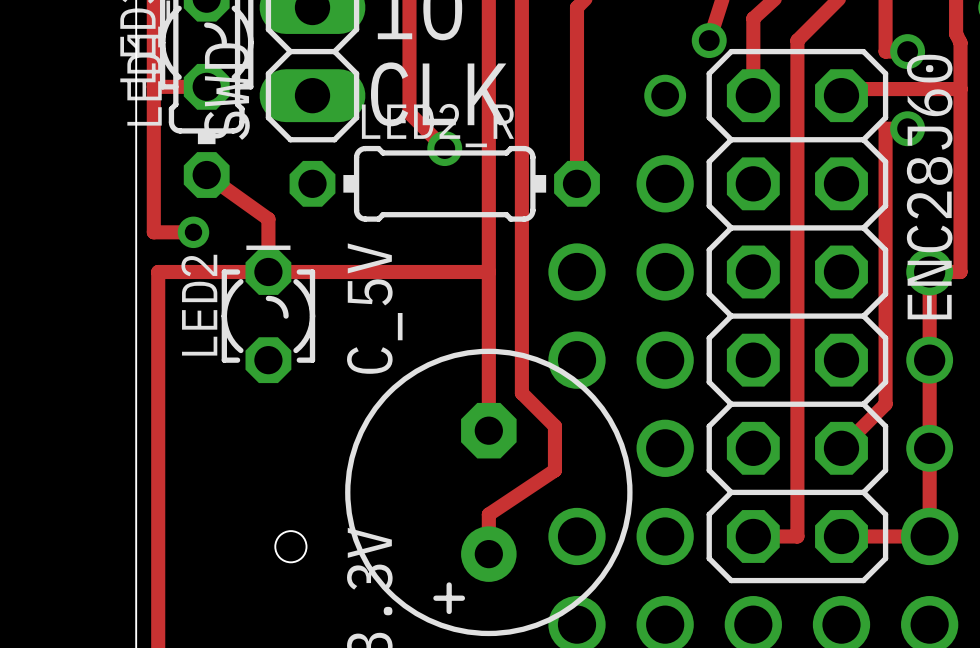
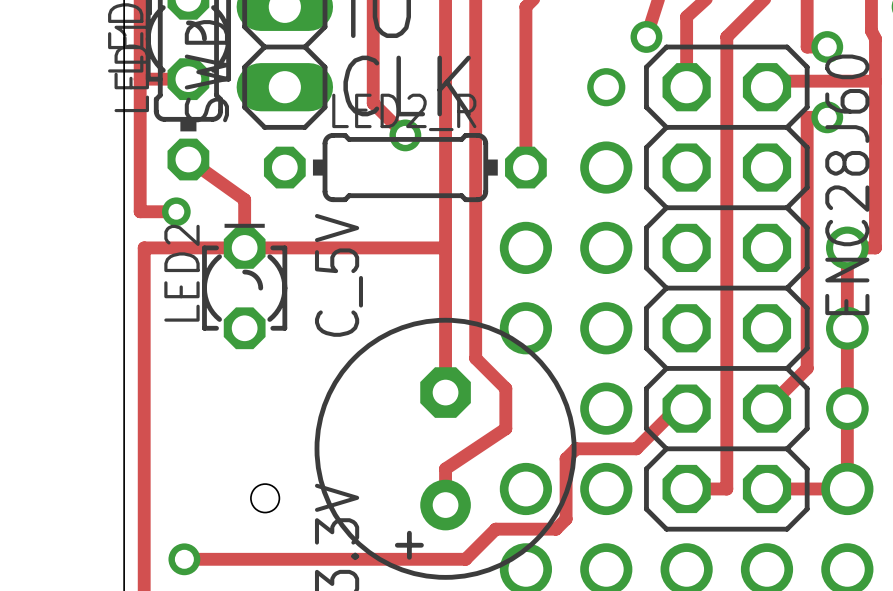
track: none -> (686, 408) (676, 408) (636, 448) (576, 448) (566, 458) (566, 519) (556, 529) (495, 529) (465, 559) (184, 559)
via: none -> (184, 559)

